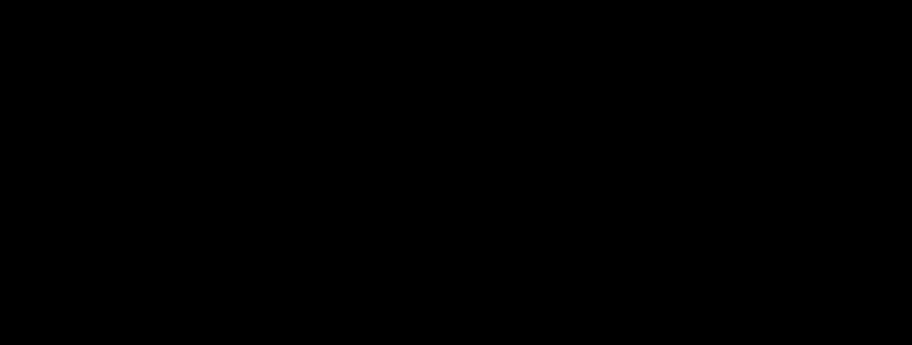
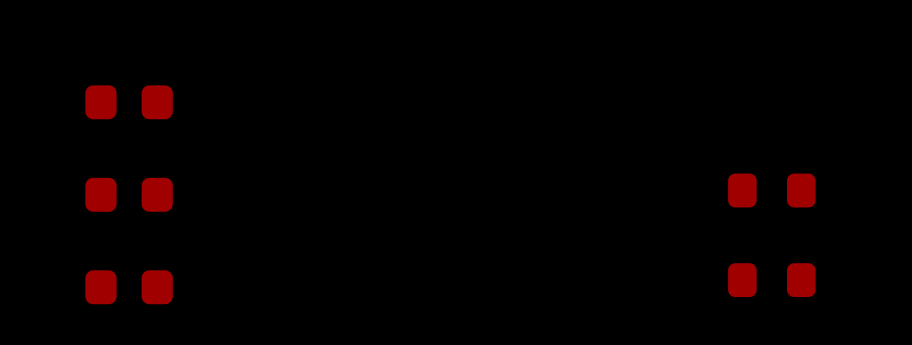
part: none -> (129, 102)
part: none -> (771, 190)
part: none -> (129, 194)
part: none -> (771, 280)
part: none -> (129, 287)

